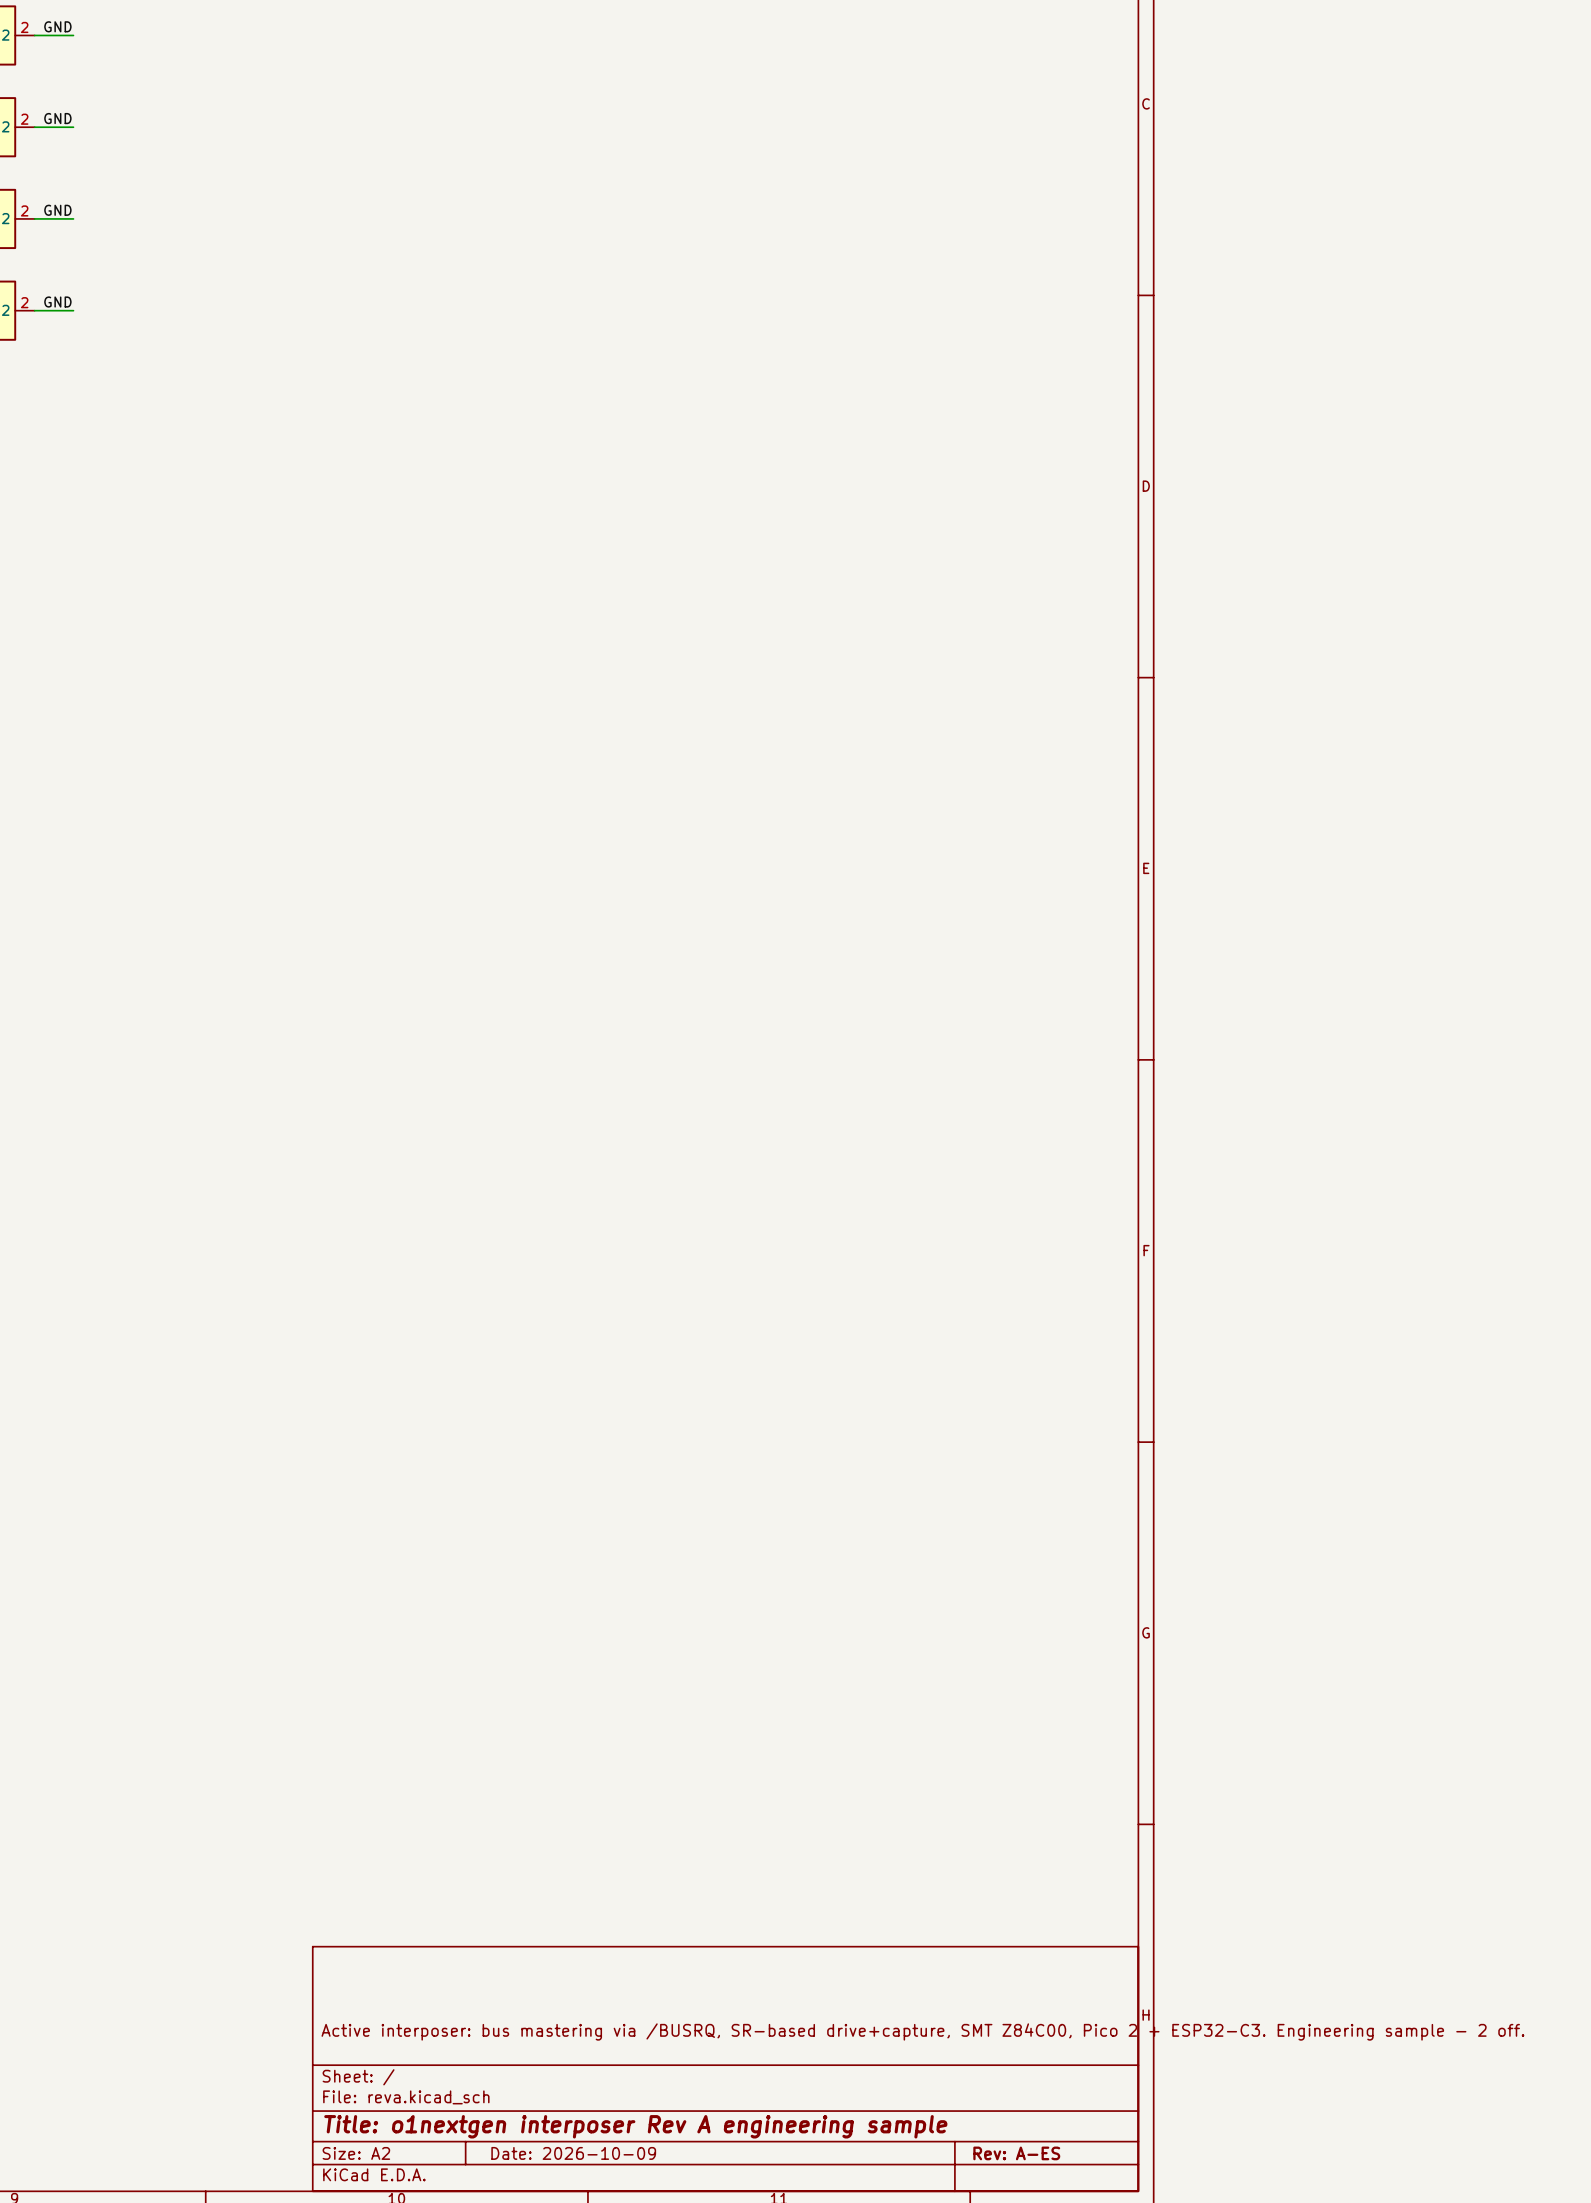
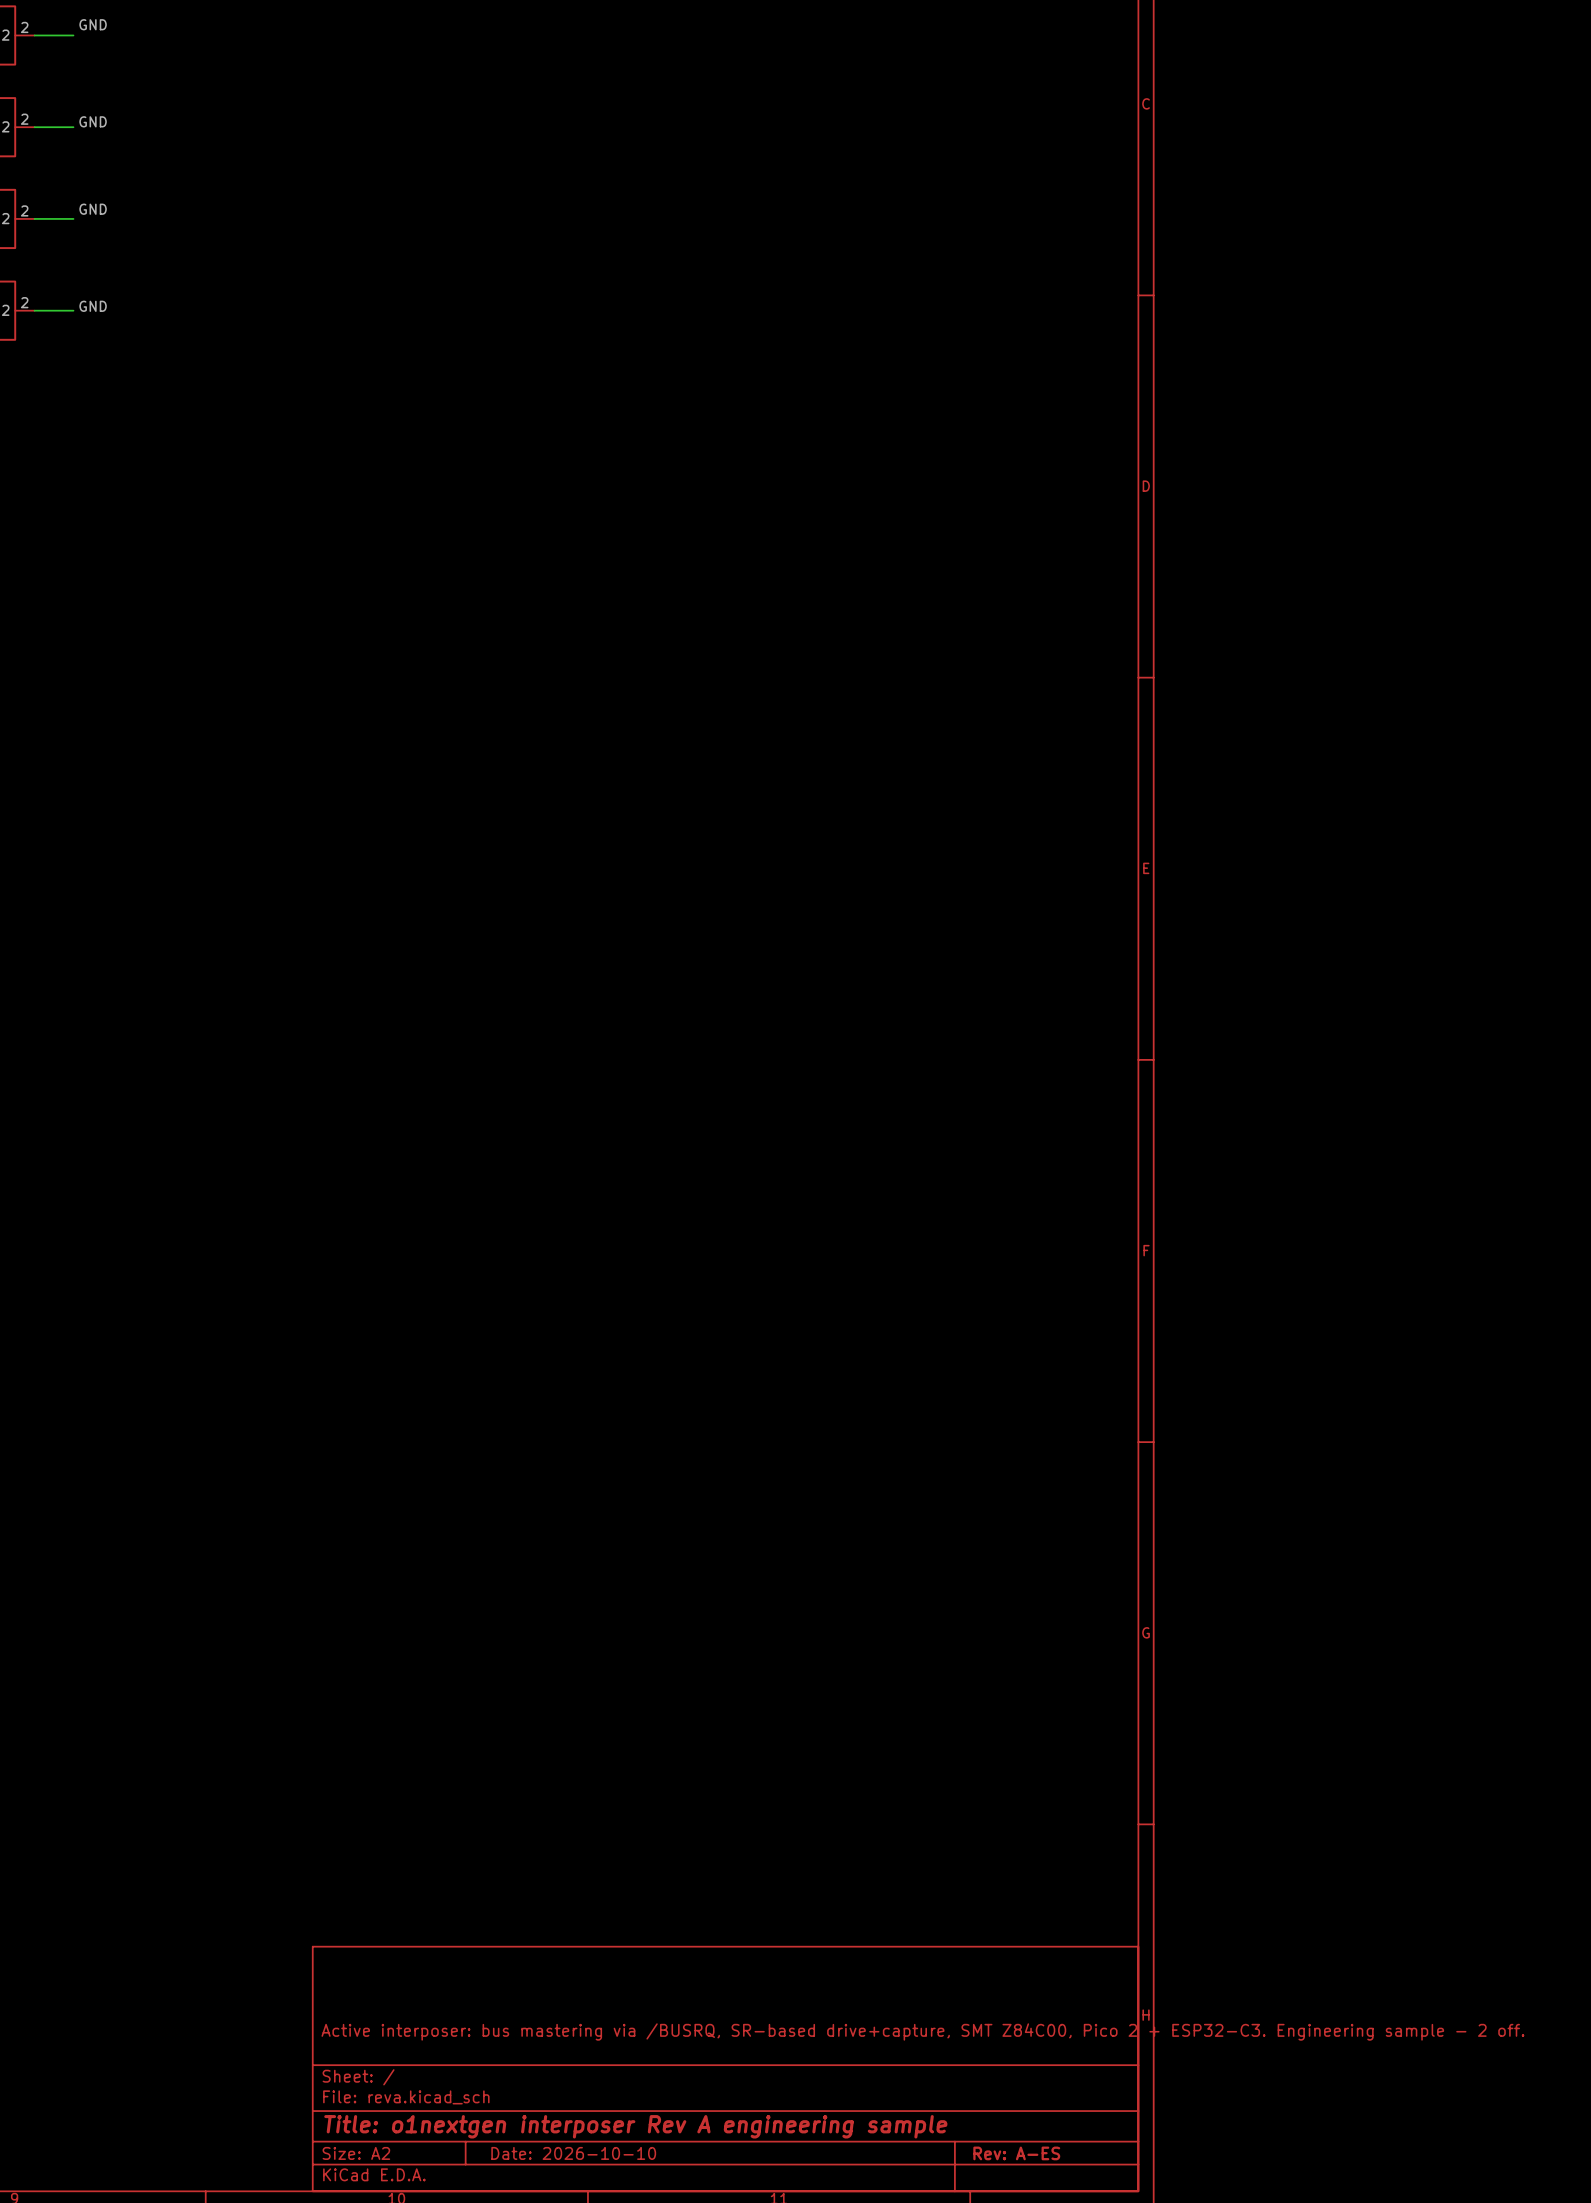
label position: GND (57, 26) -> GND (93, 24)
label position: GND (57, 118) -> GND (93, 121)
label position: GND (57, 210) -> GND (93, 209)
label position: GND (57, 302) -> GND (93, 306)
title block: Date: 2026-10-09 (573, 2153) -> Date: 2026-10-10 (573, 2153)

